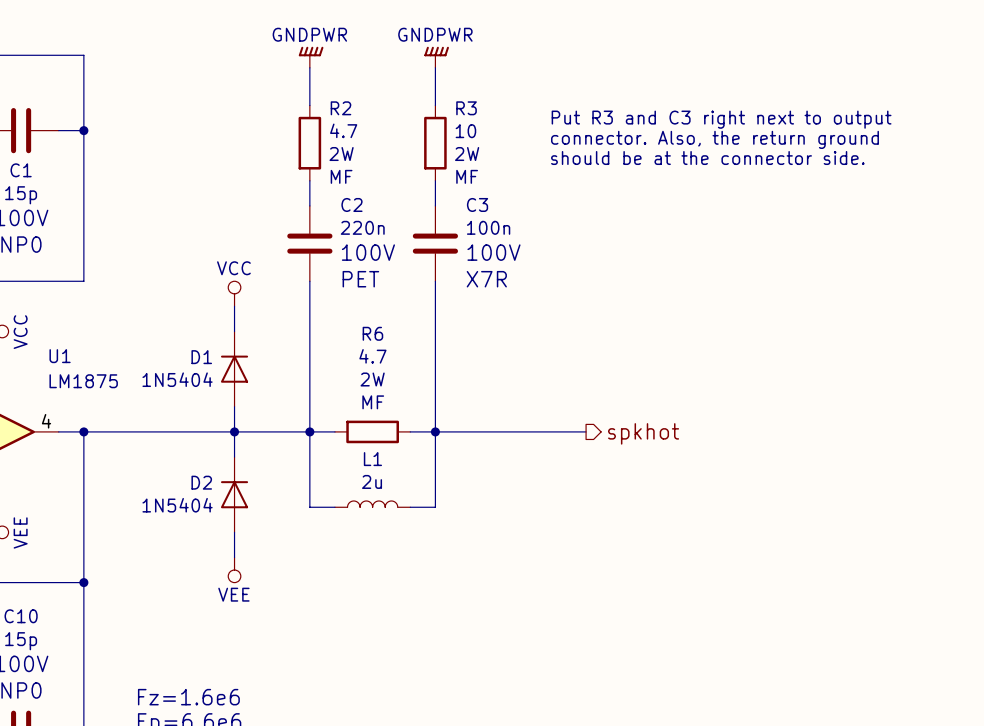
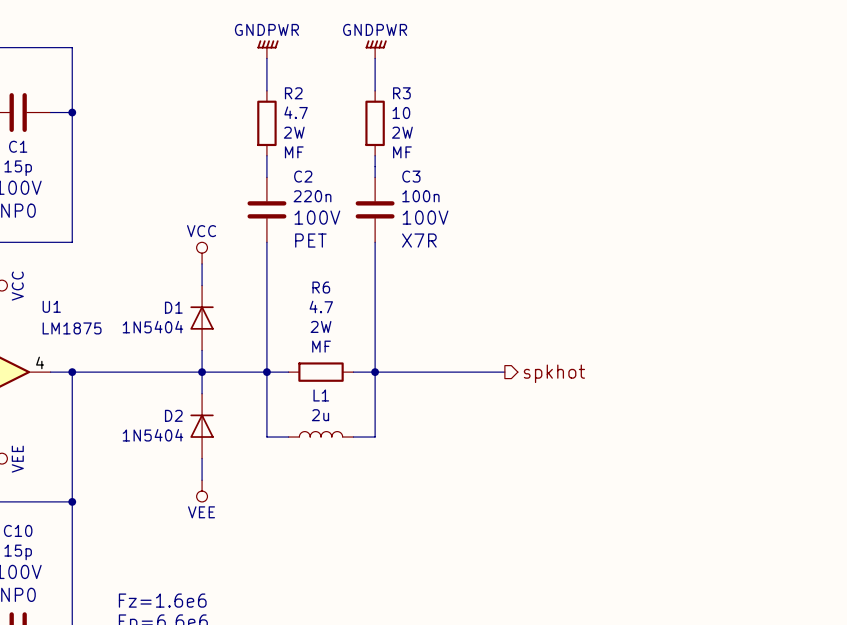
text: Put R3 and C3 right next to output (721, 119) -> none
text: connector. Also, the return ground (714, 139) -> none
text: should be at the connector side. (707, 158) -> none

